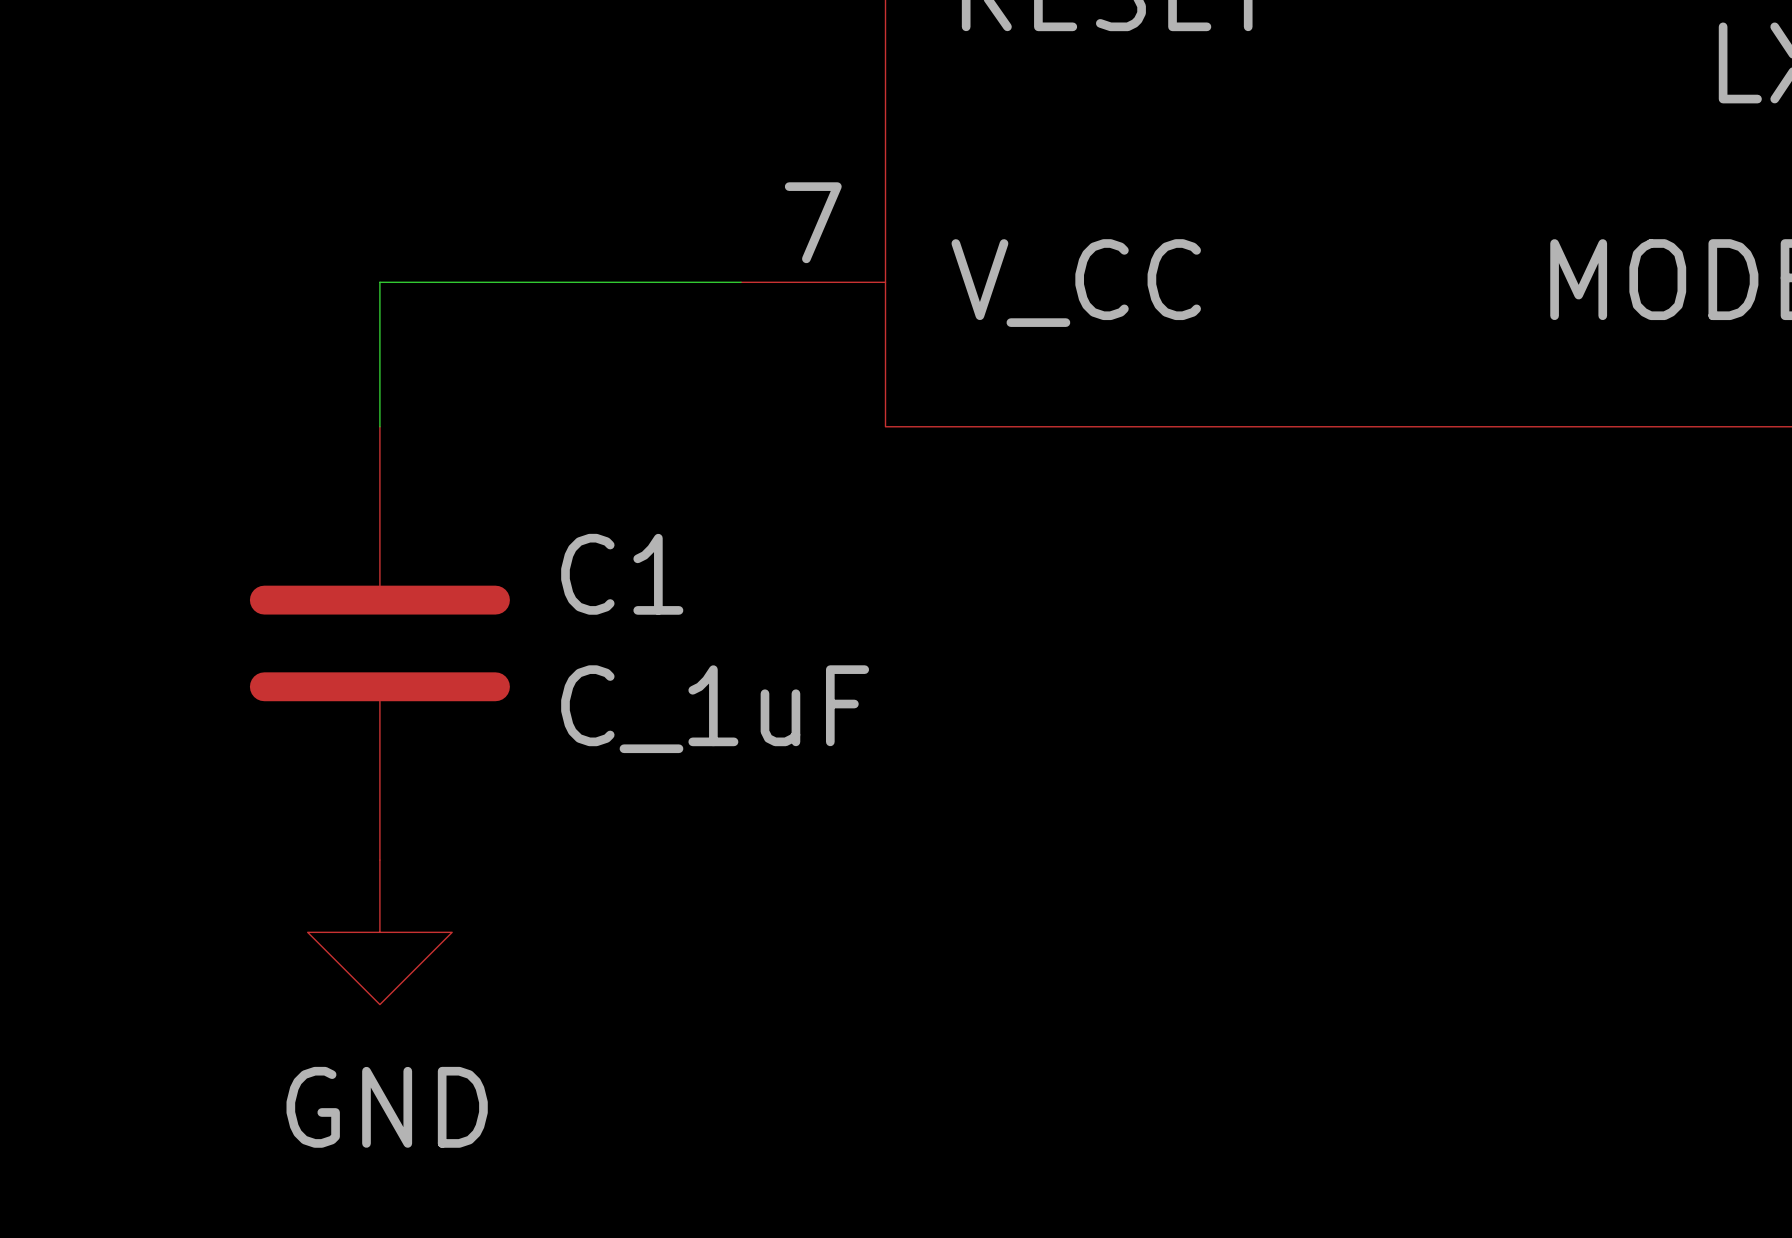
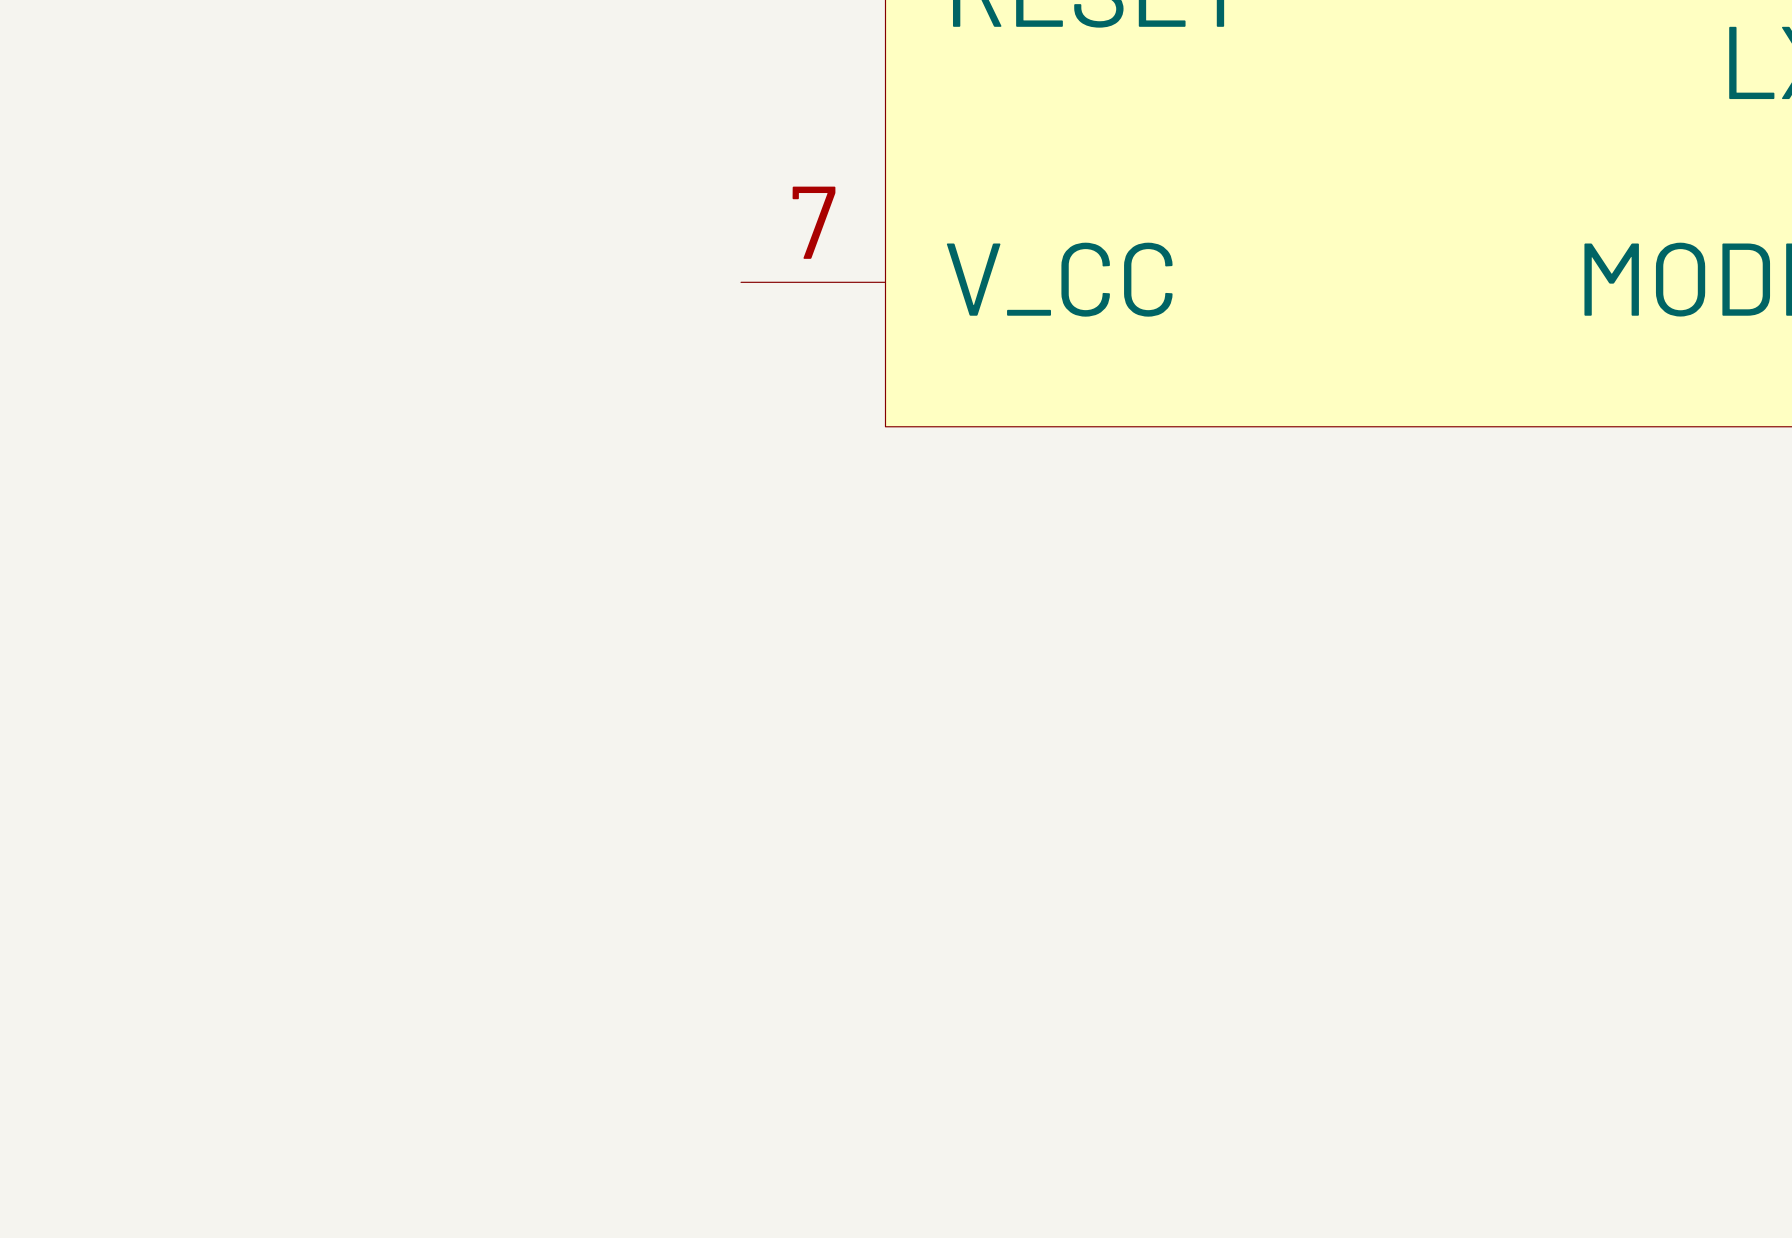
wire: (741, 282) (379, 282) (379, 426) -> none
C1: C_1uF (379, 643) -> none
power symbol: GND (379, 932) -> none

